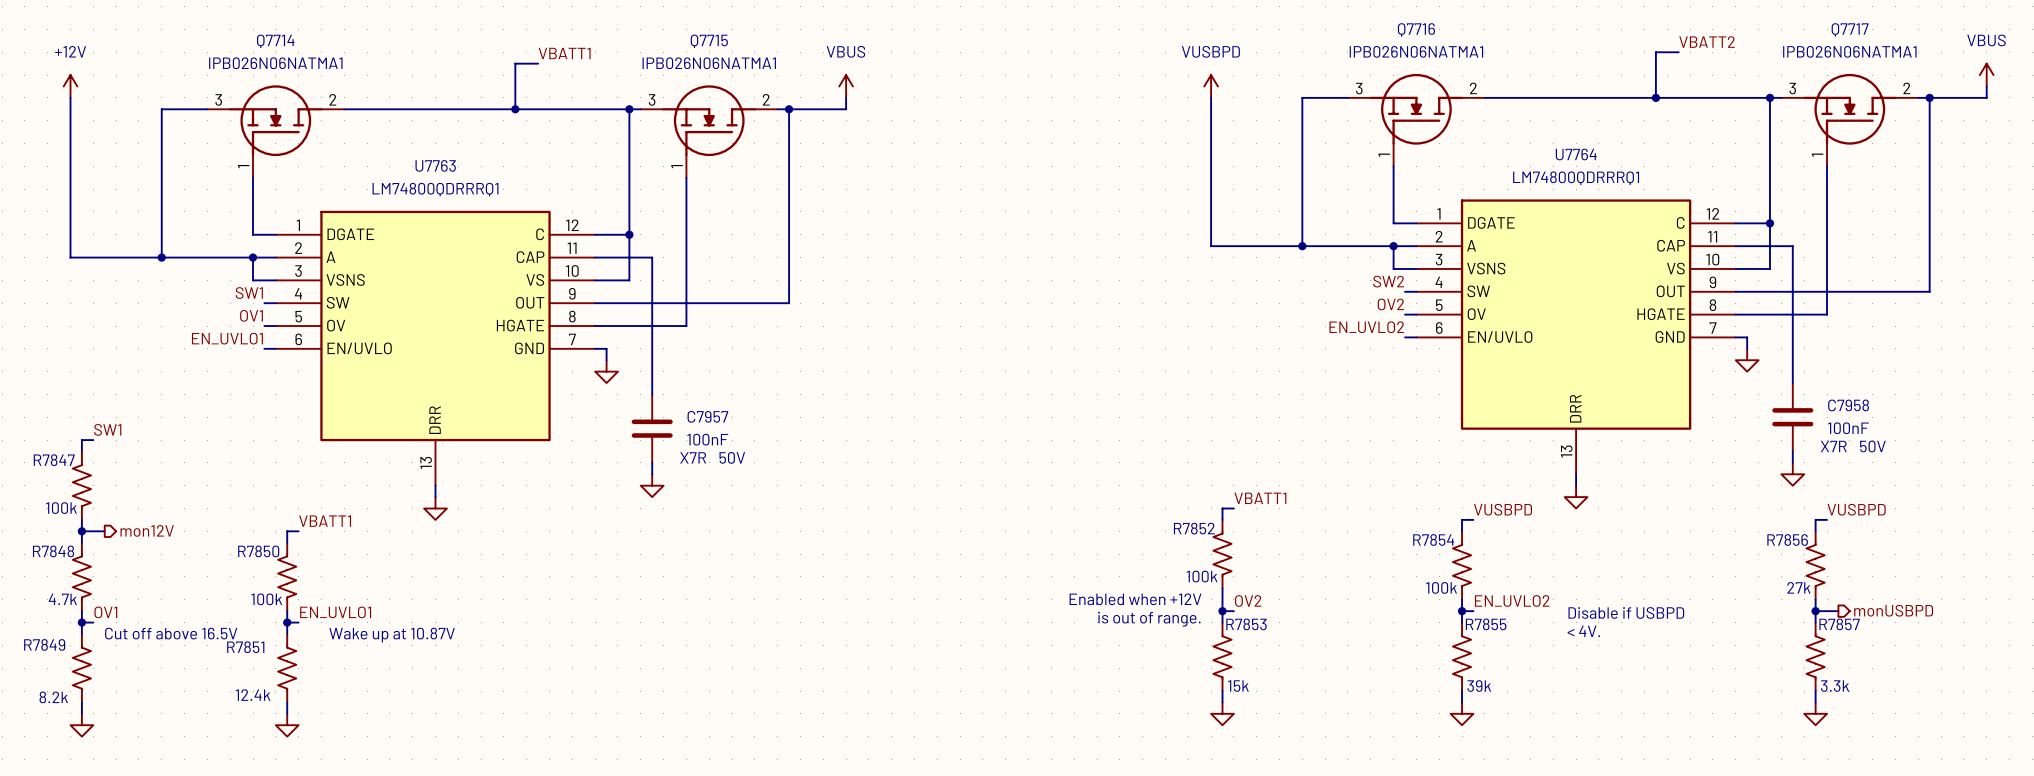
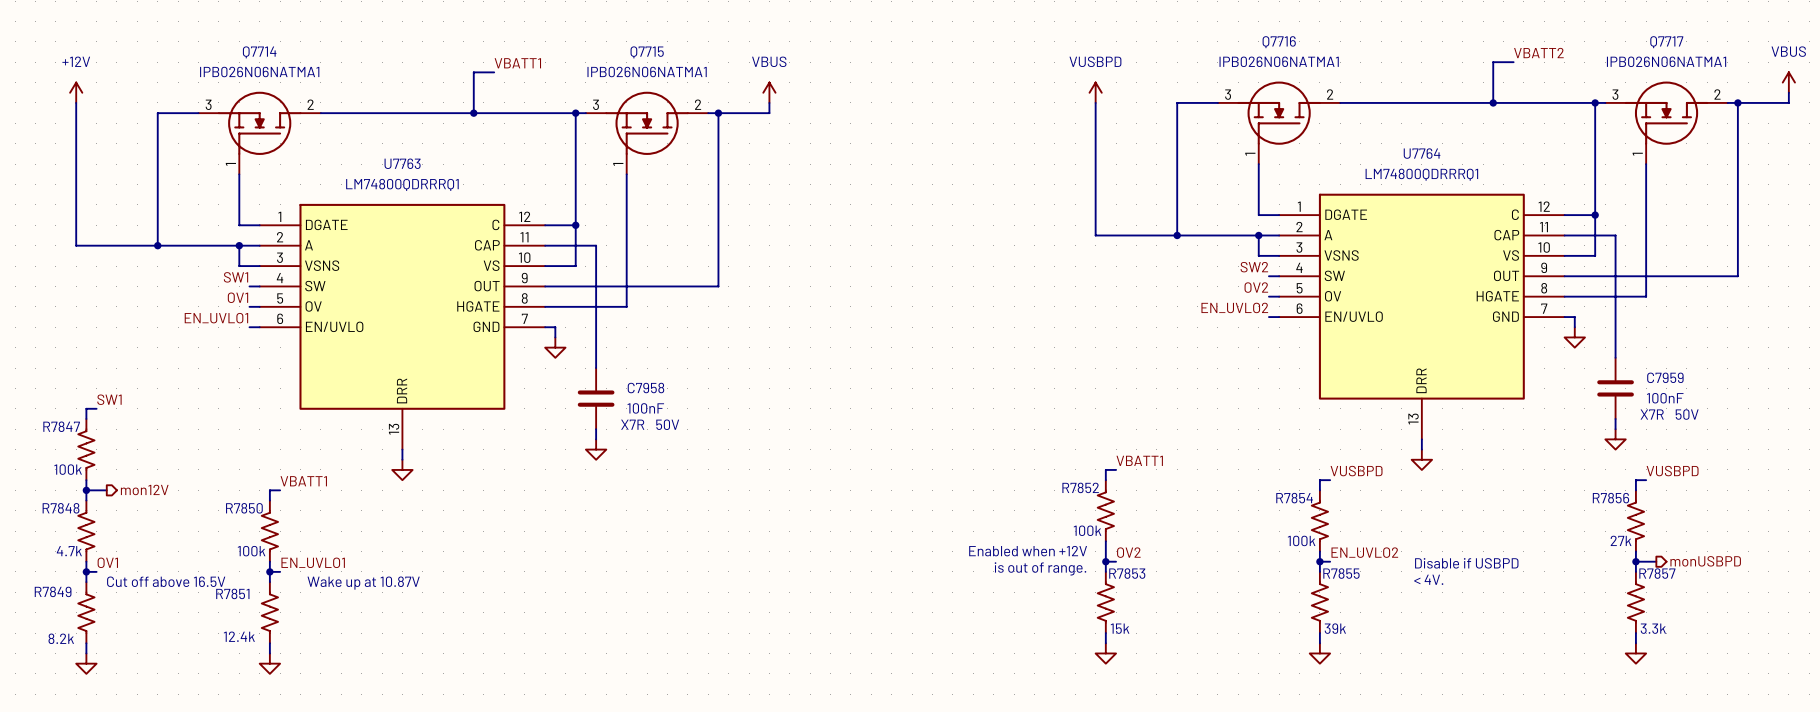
C7958 name: C7958 (1848, 405) -> C7959 (1665, 377)
C7957 name: C7957 (707, 416) -> C7958 (645, 388)

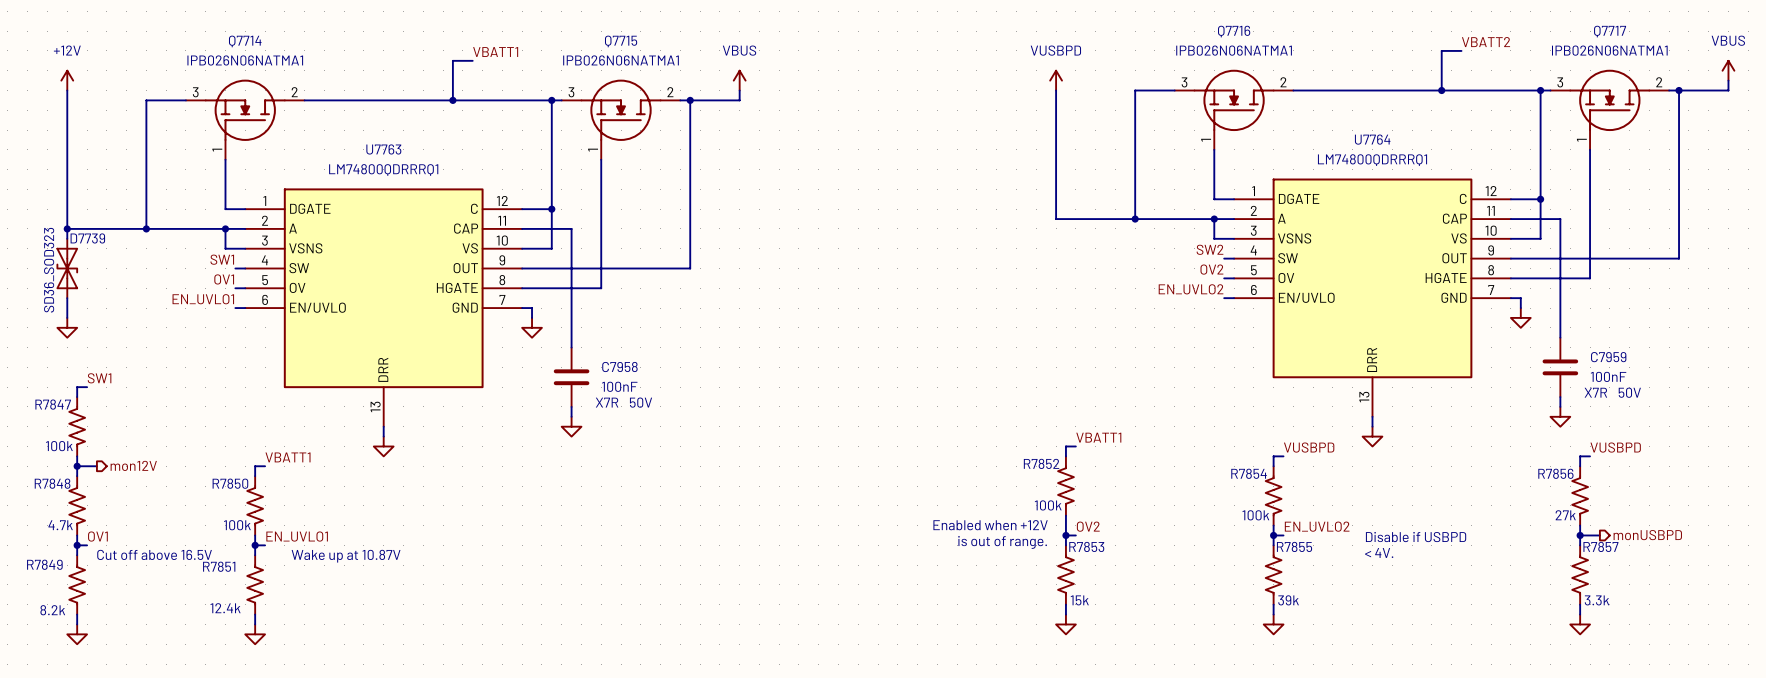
wire: none -> (67, 228) (67, 238)
junction: none -> (67, 228)
D7739: none -> SD36_SOD323 (67, 268)
wire: none -> (67, 298) (67, 317)
power symbol: none -> (67, 327)

